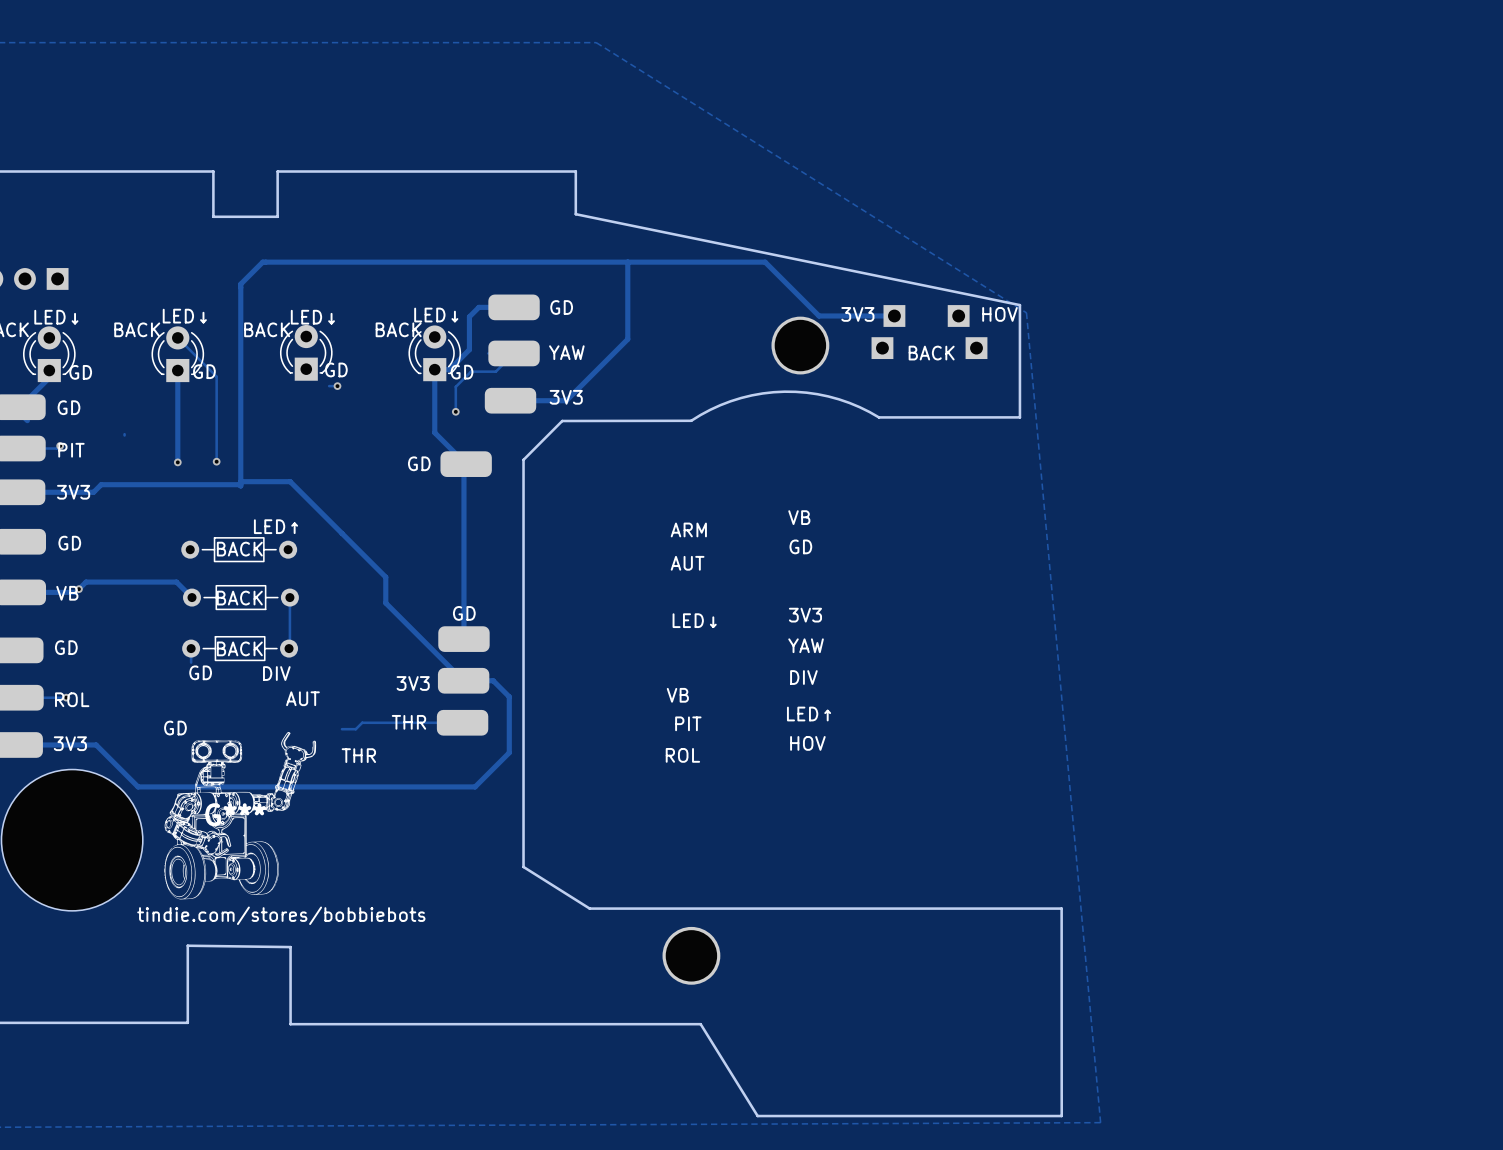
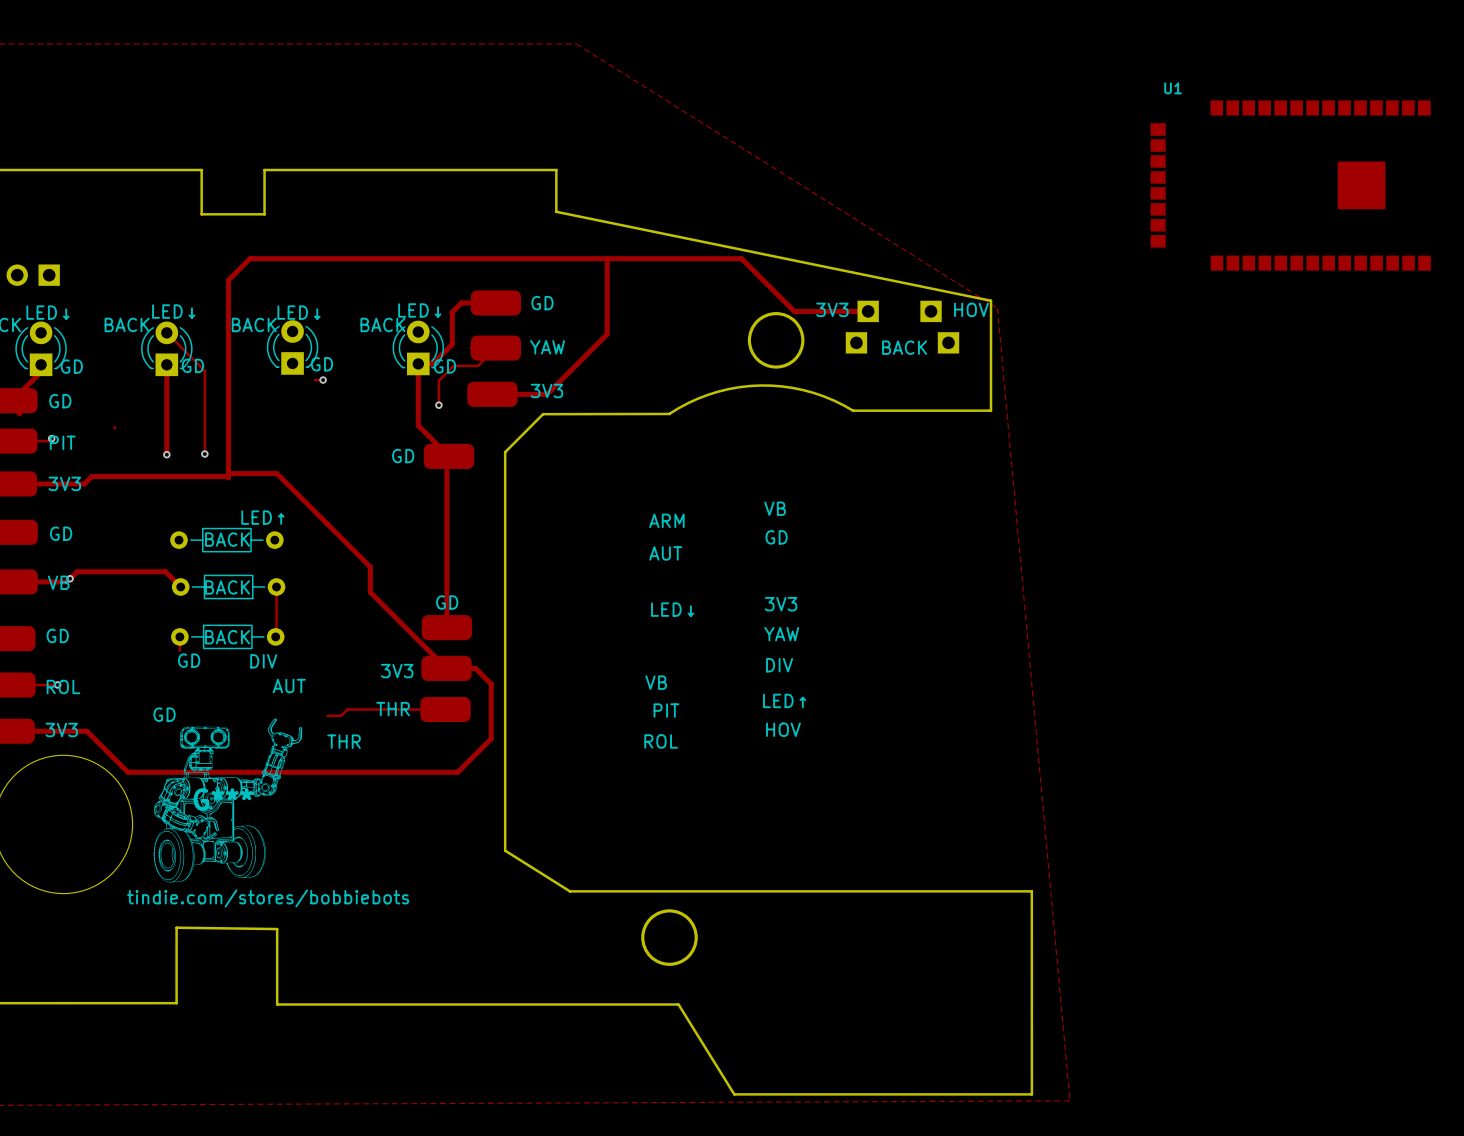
U1: none -> (1290, 185)

